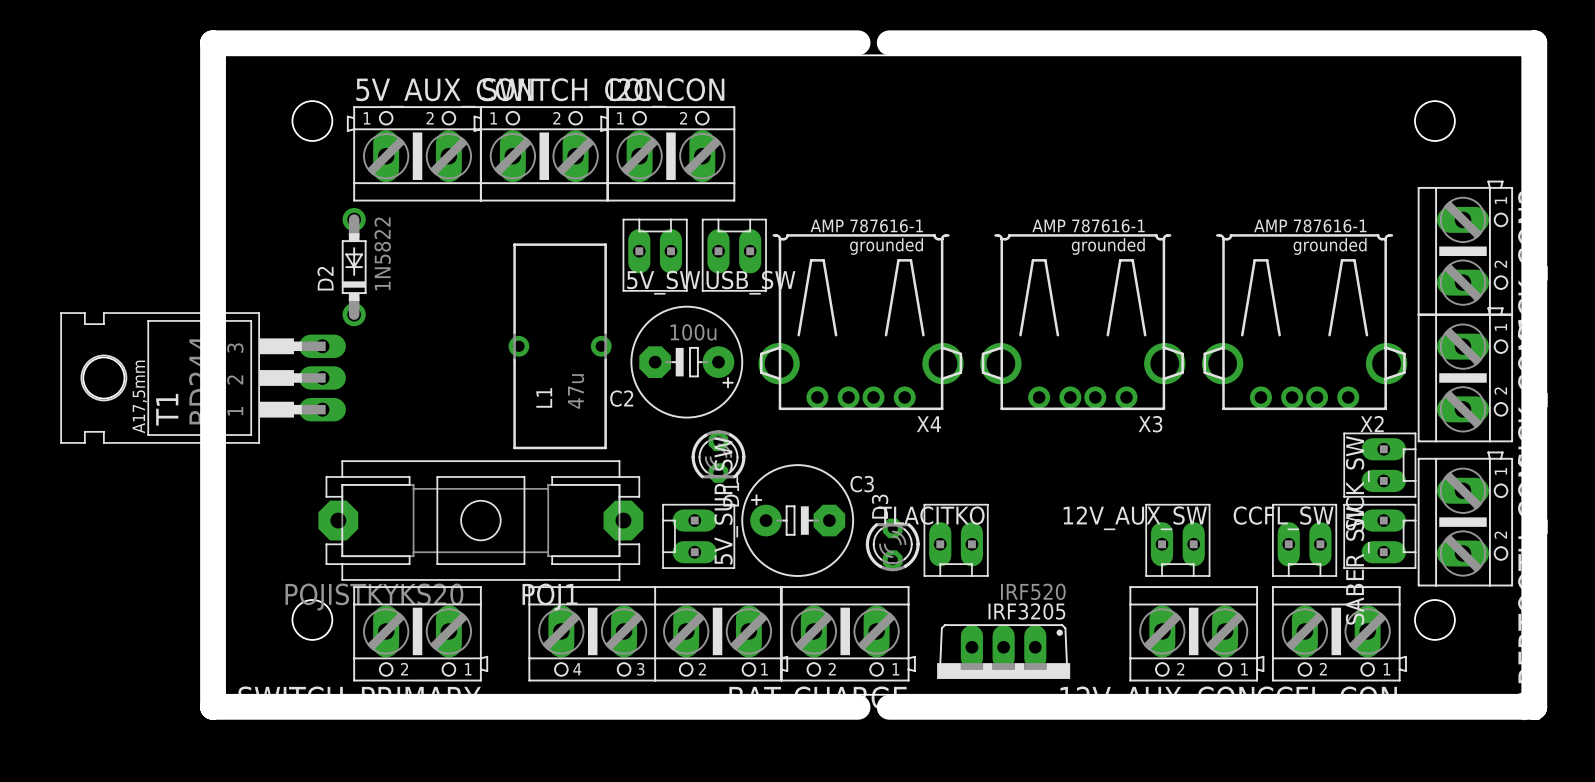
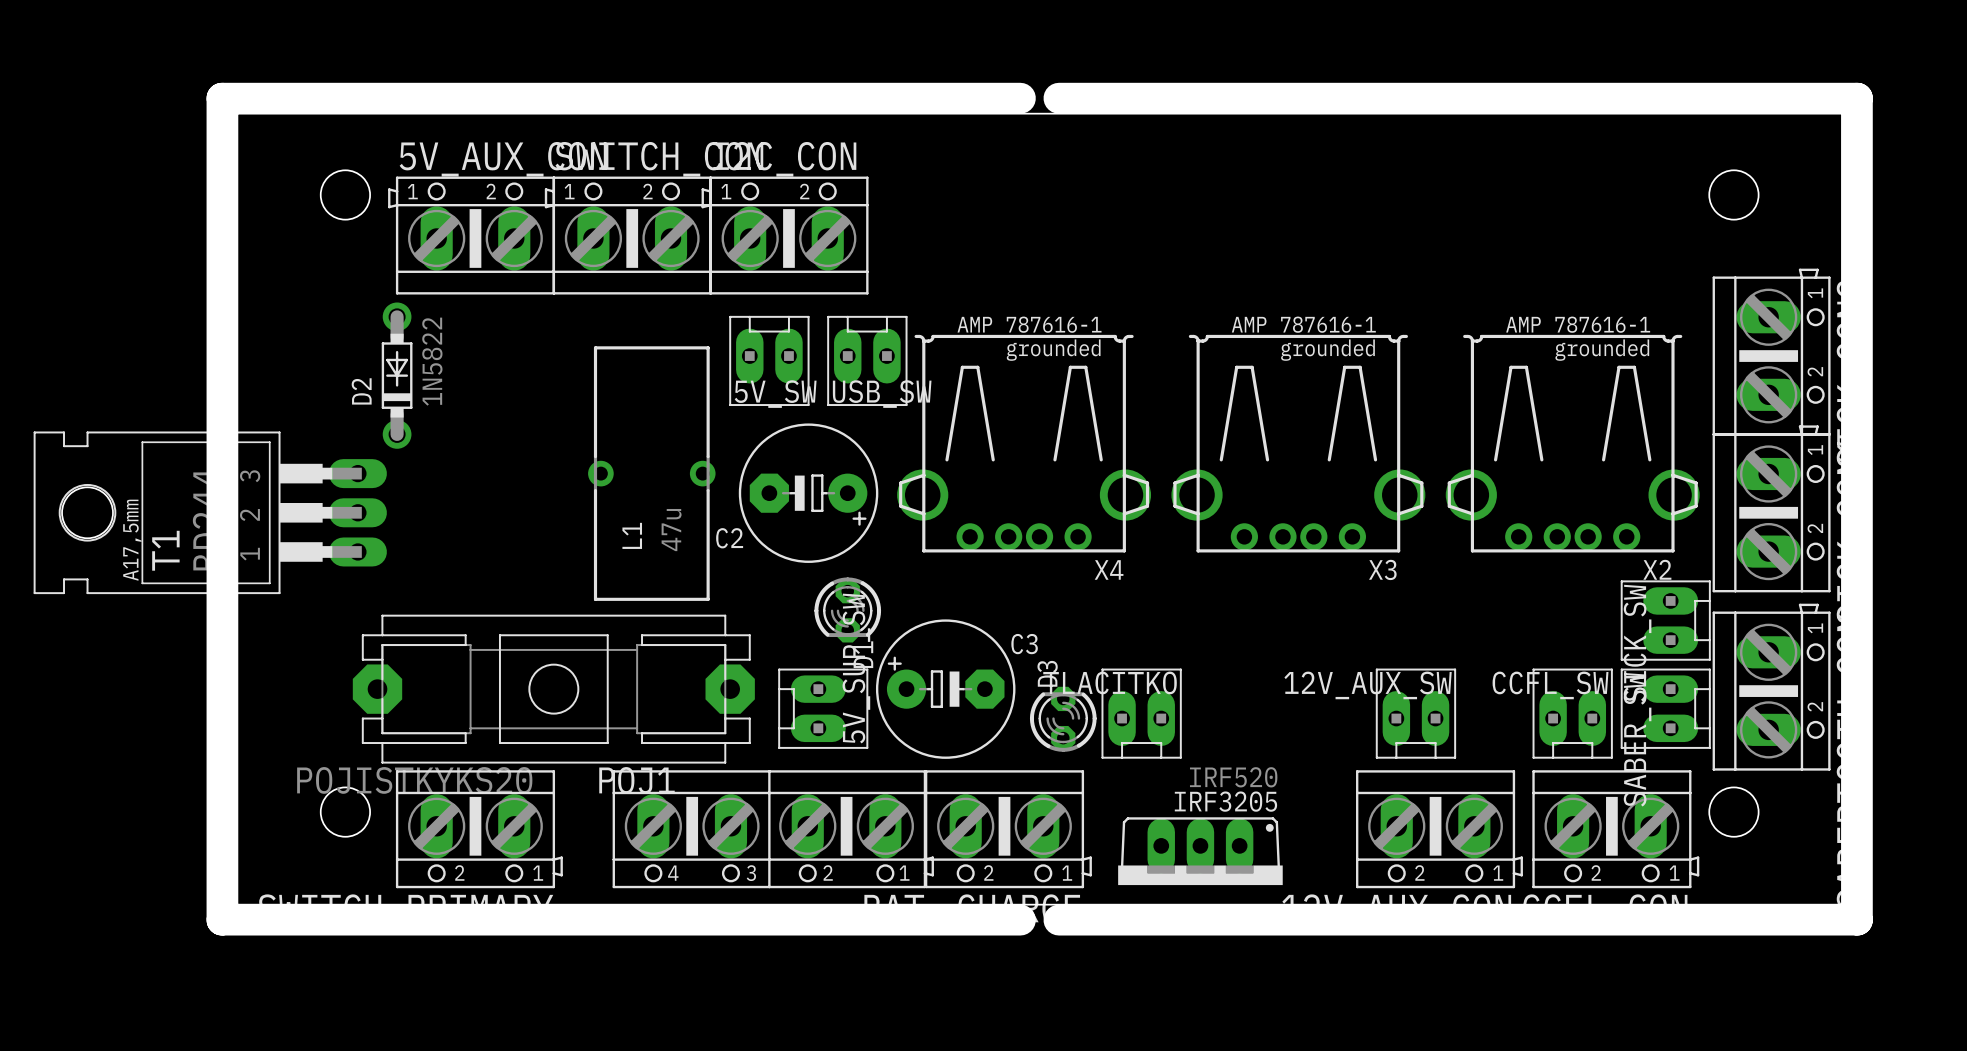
C2 value: 100u (693, 332) -> none

